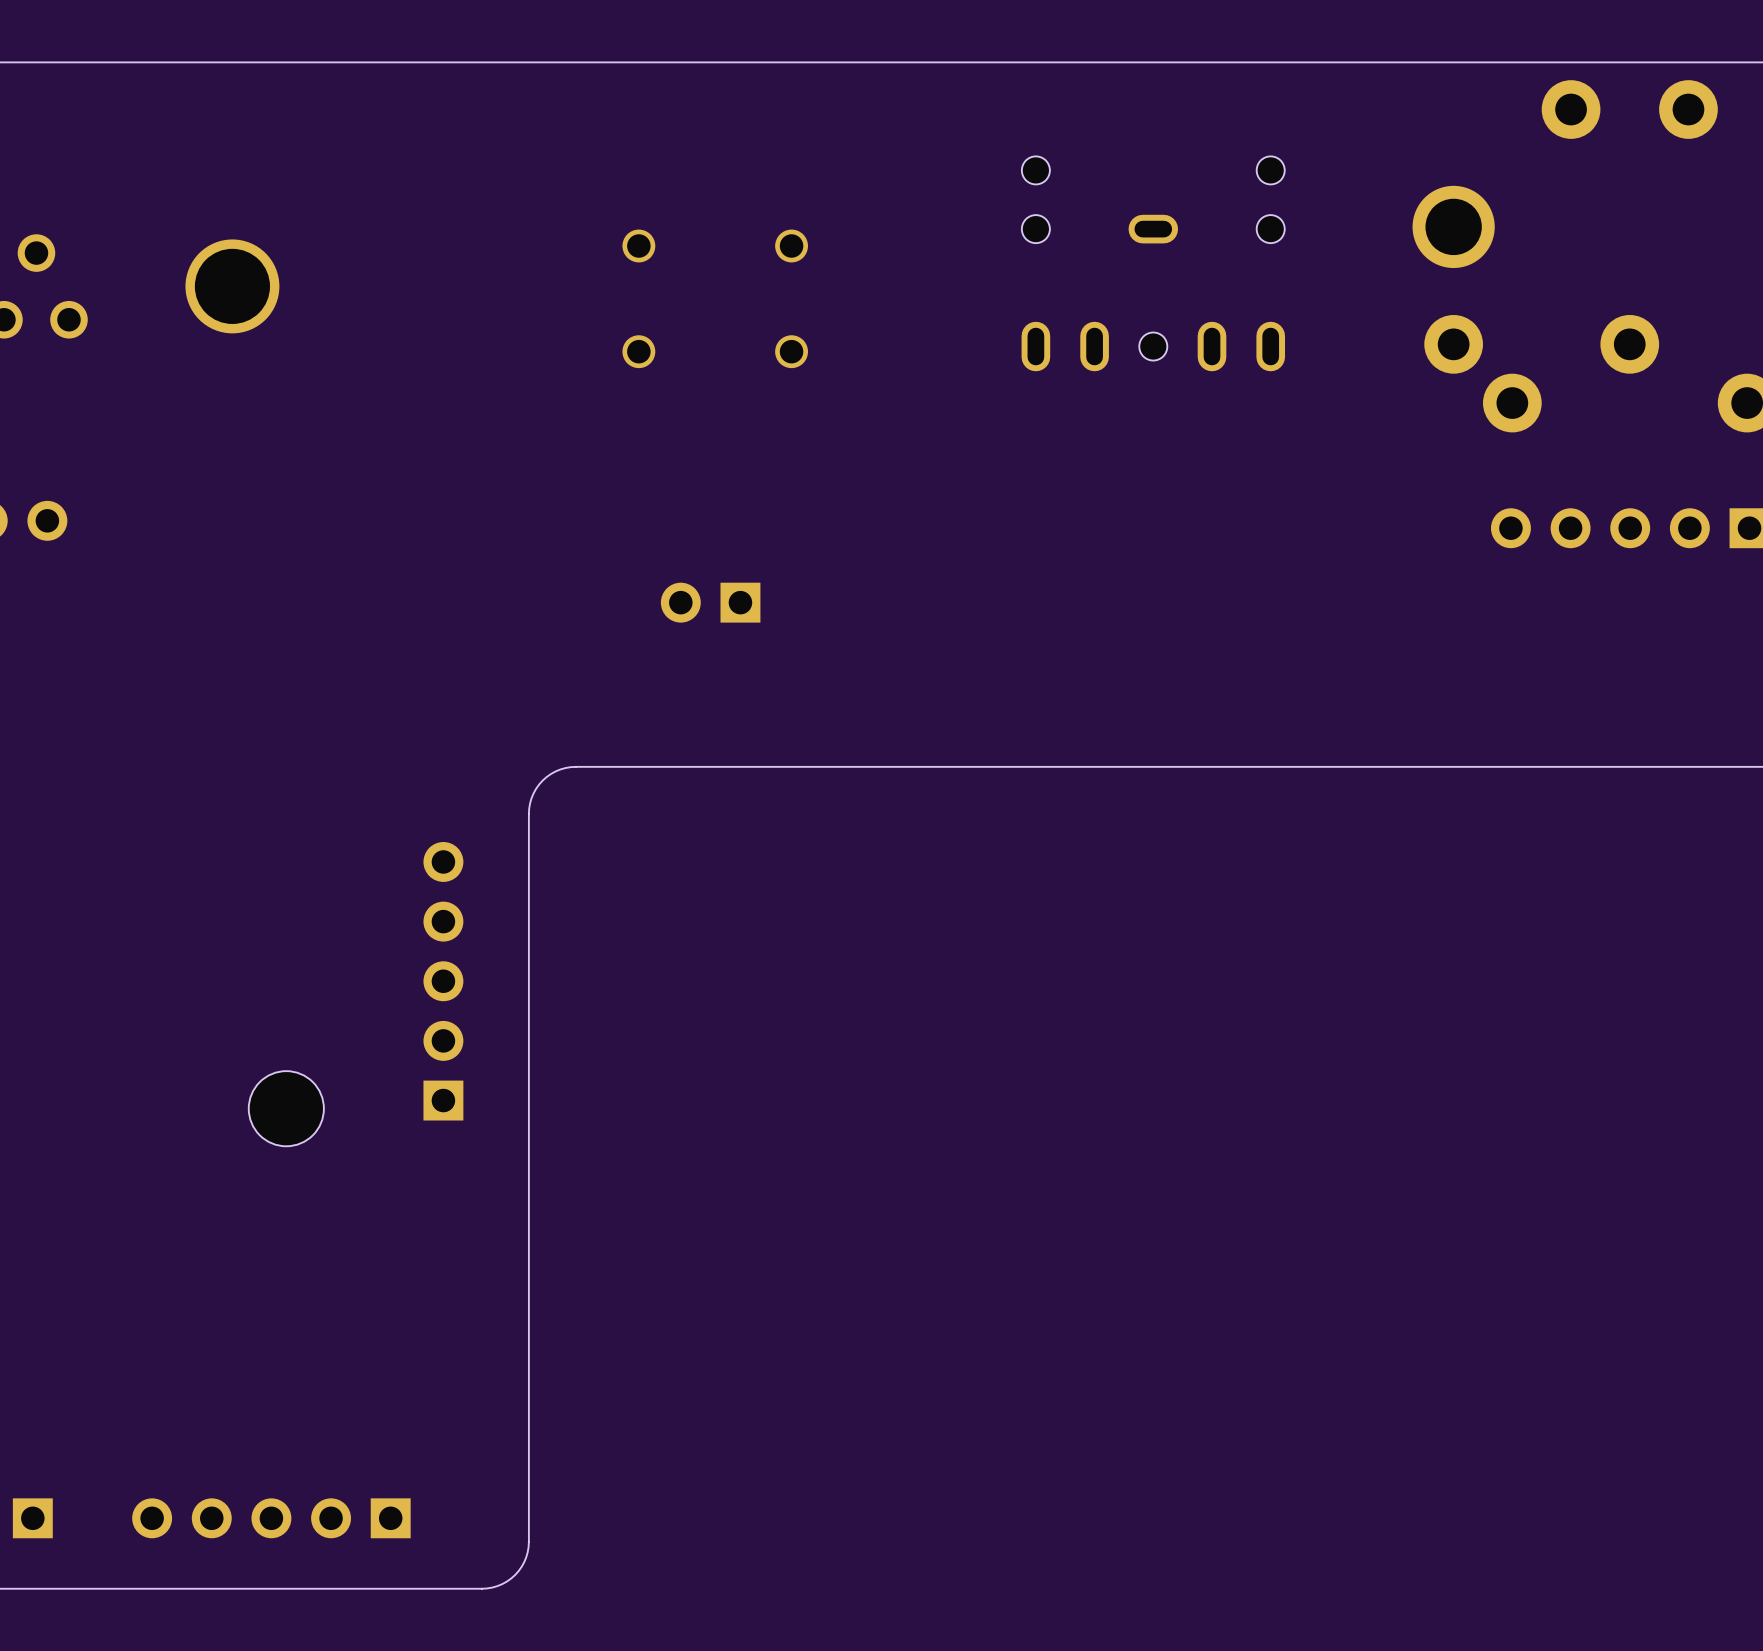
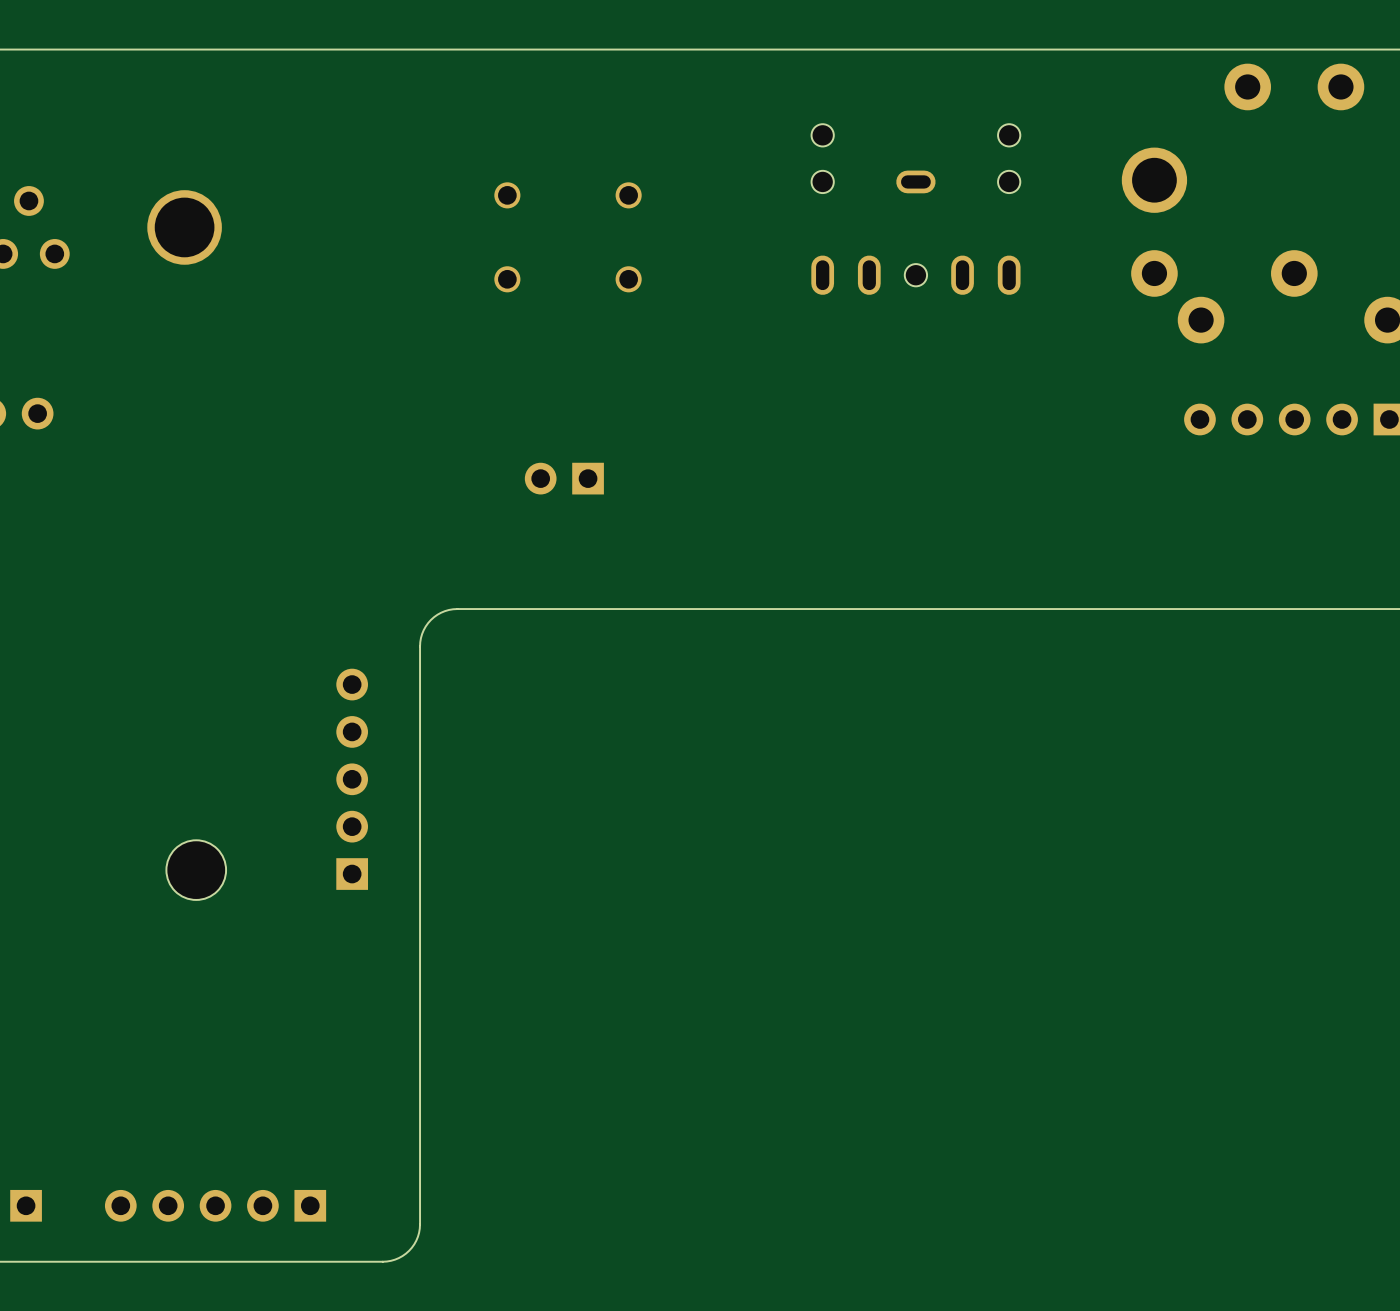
part position: (286, 1108) -> (196, 870)

